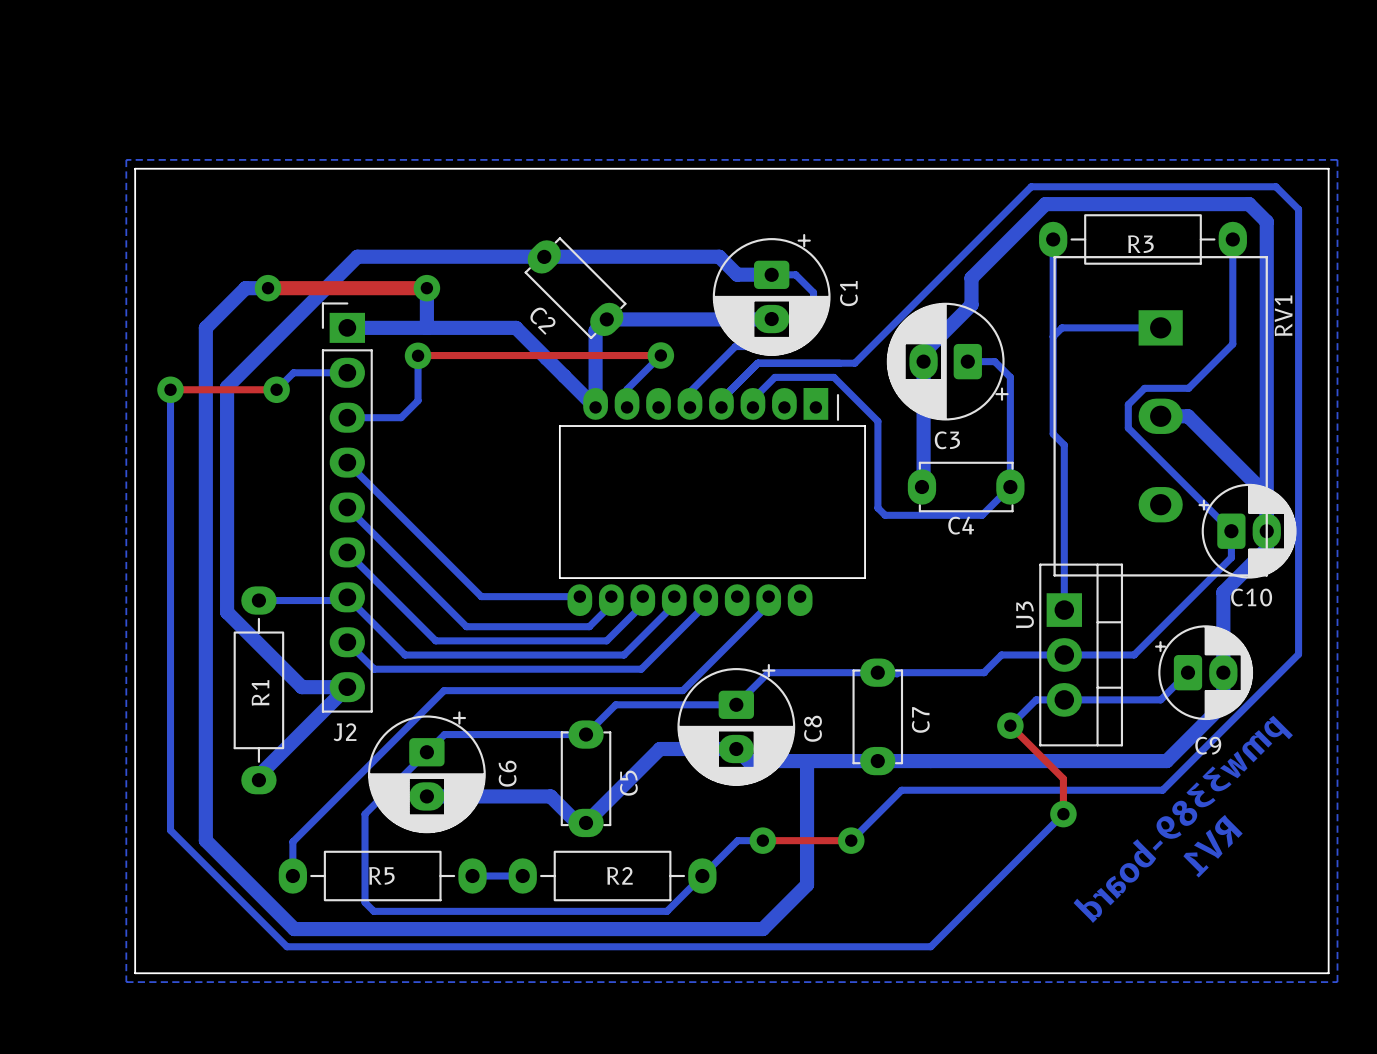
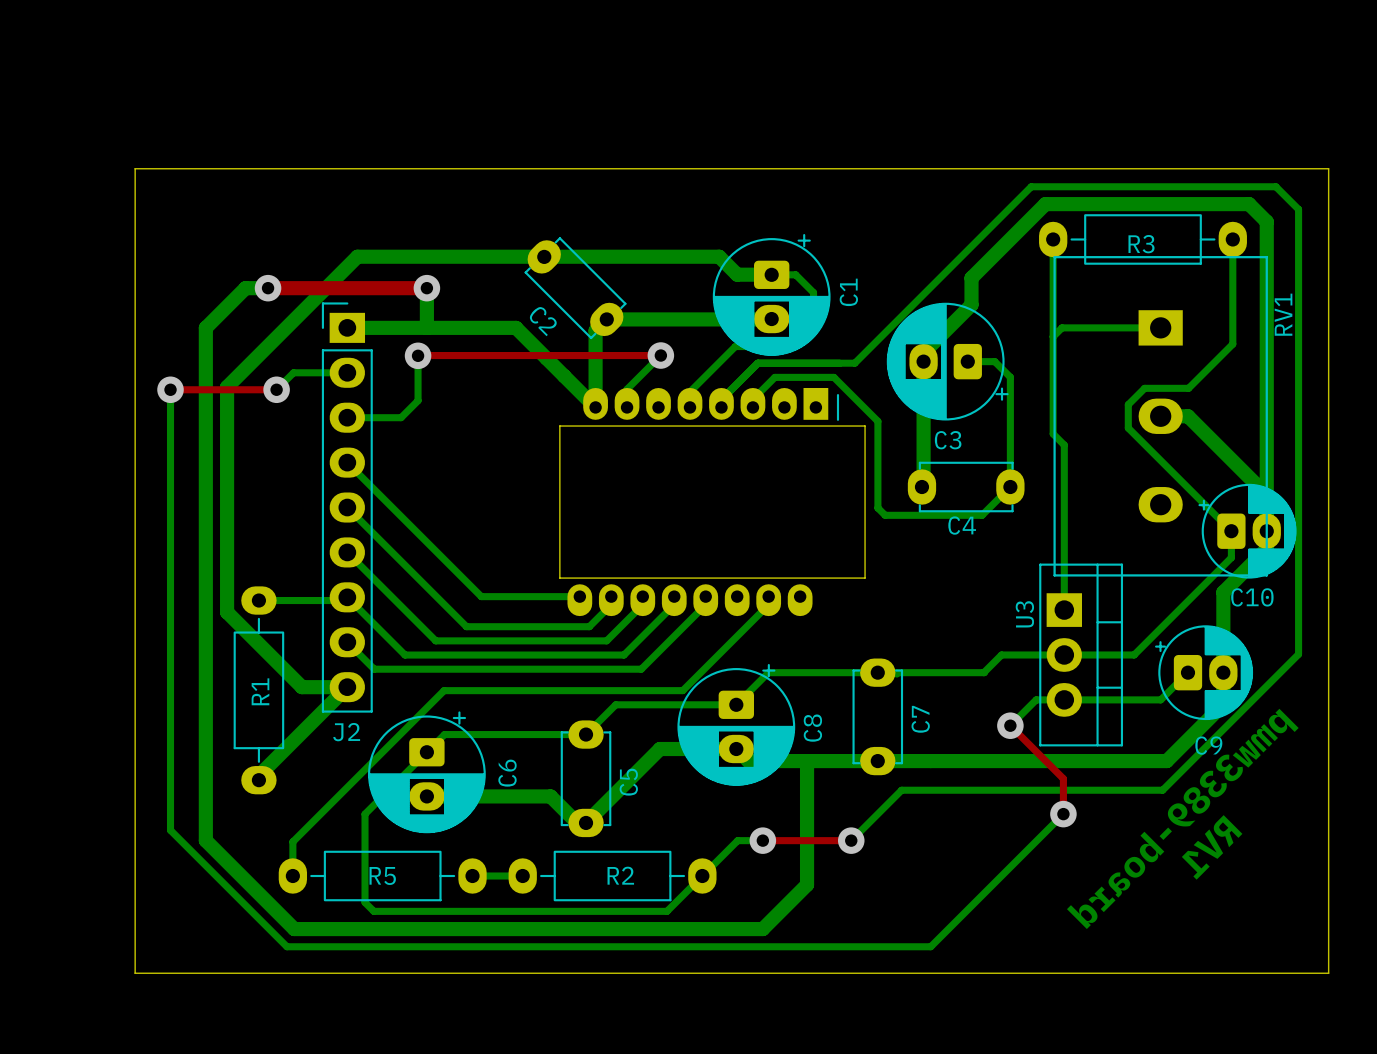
bottom zone outline: (126, 159) (126, 982) (1337, 982) (1337, 159) (126, 159) -> none

